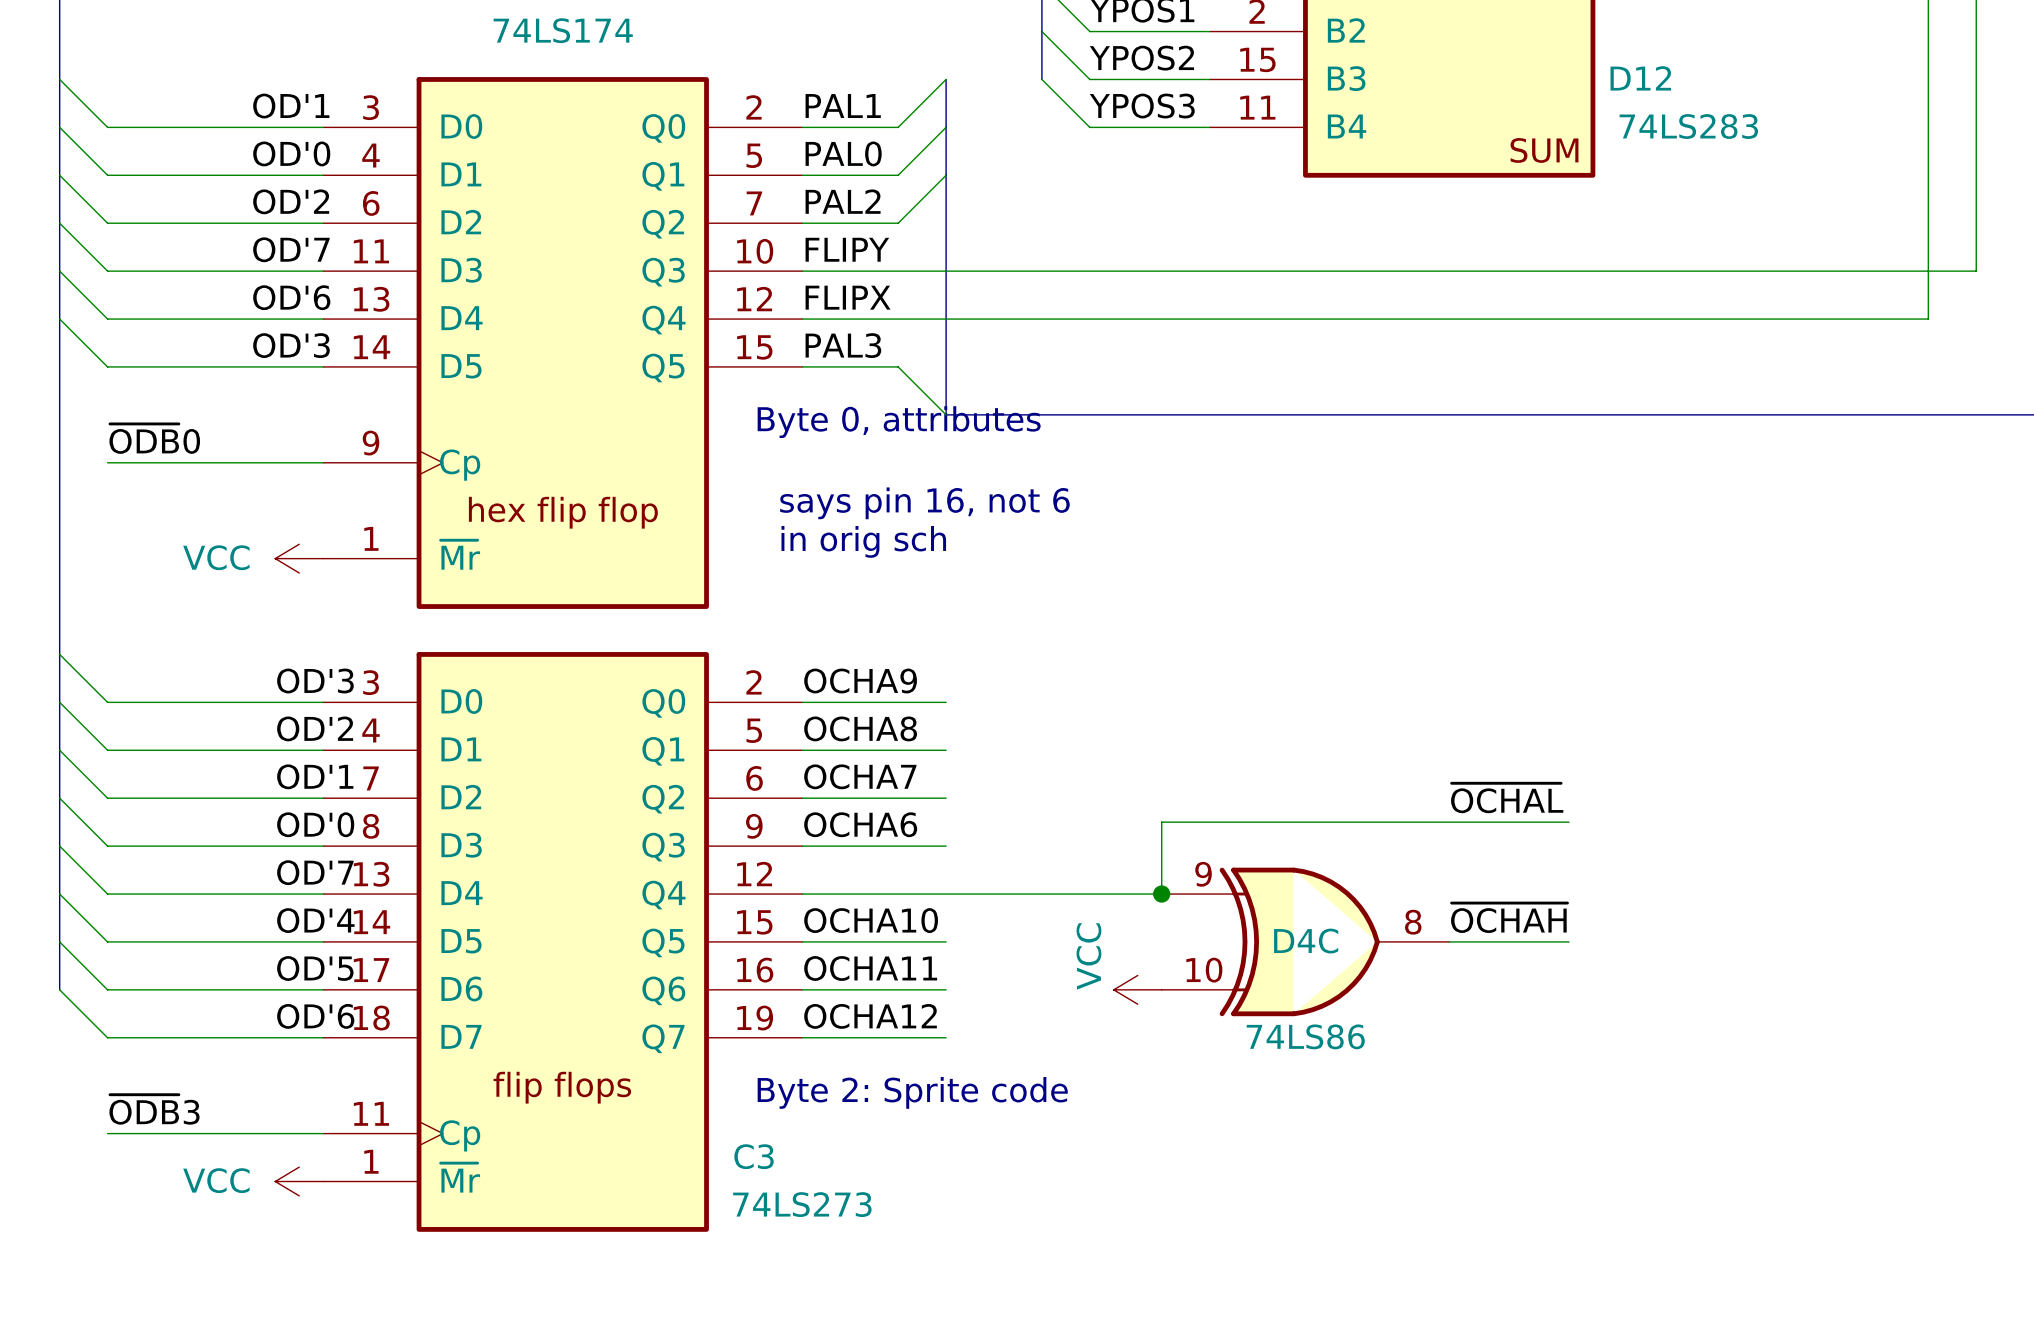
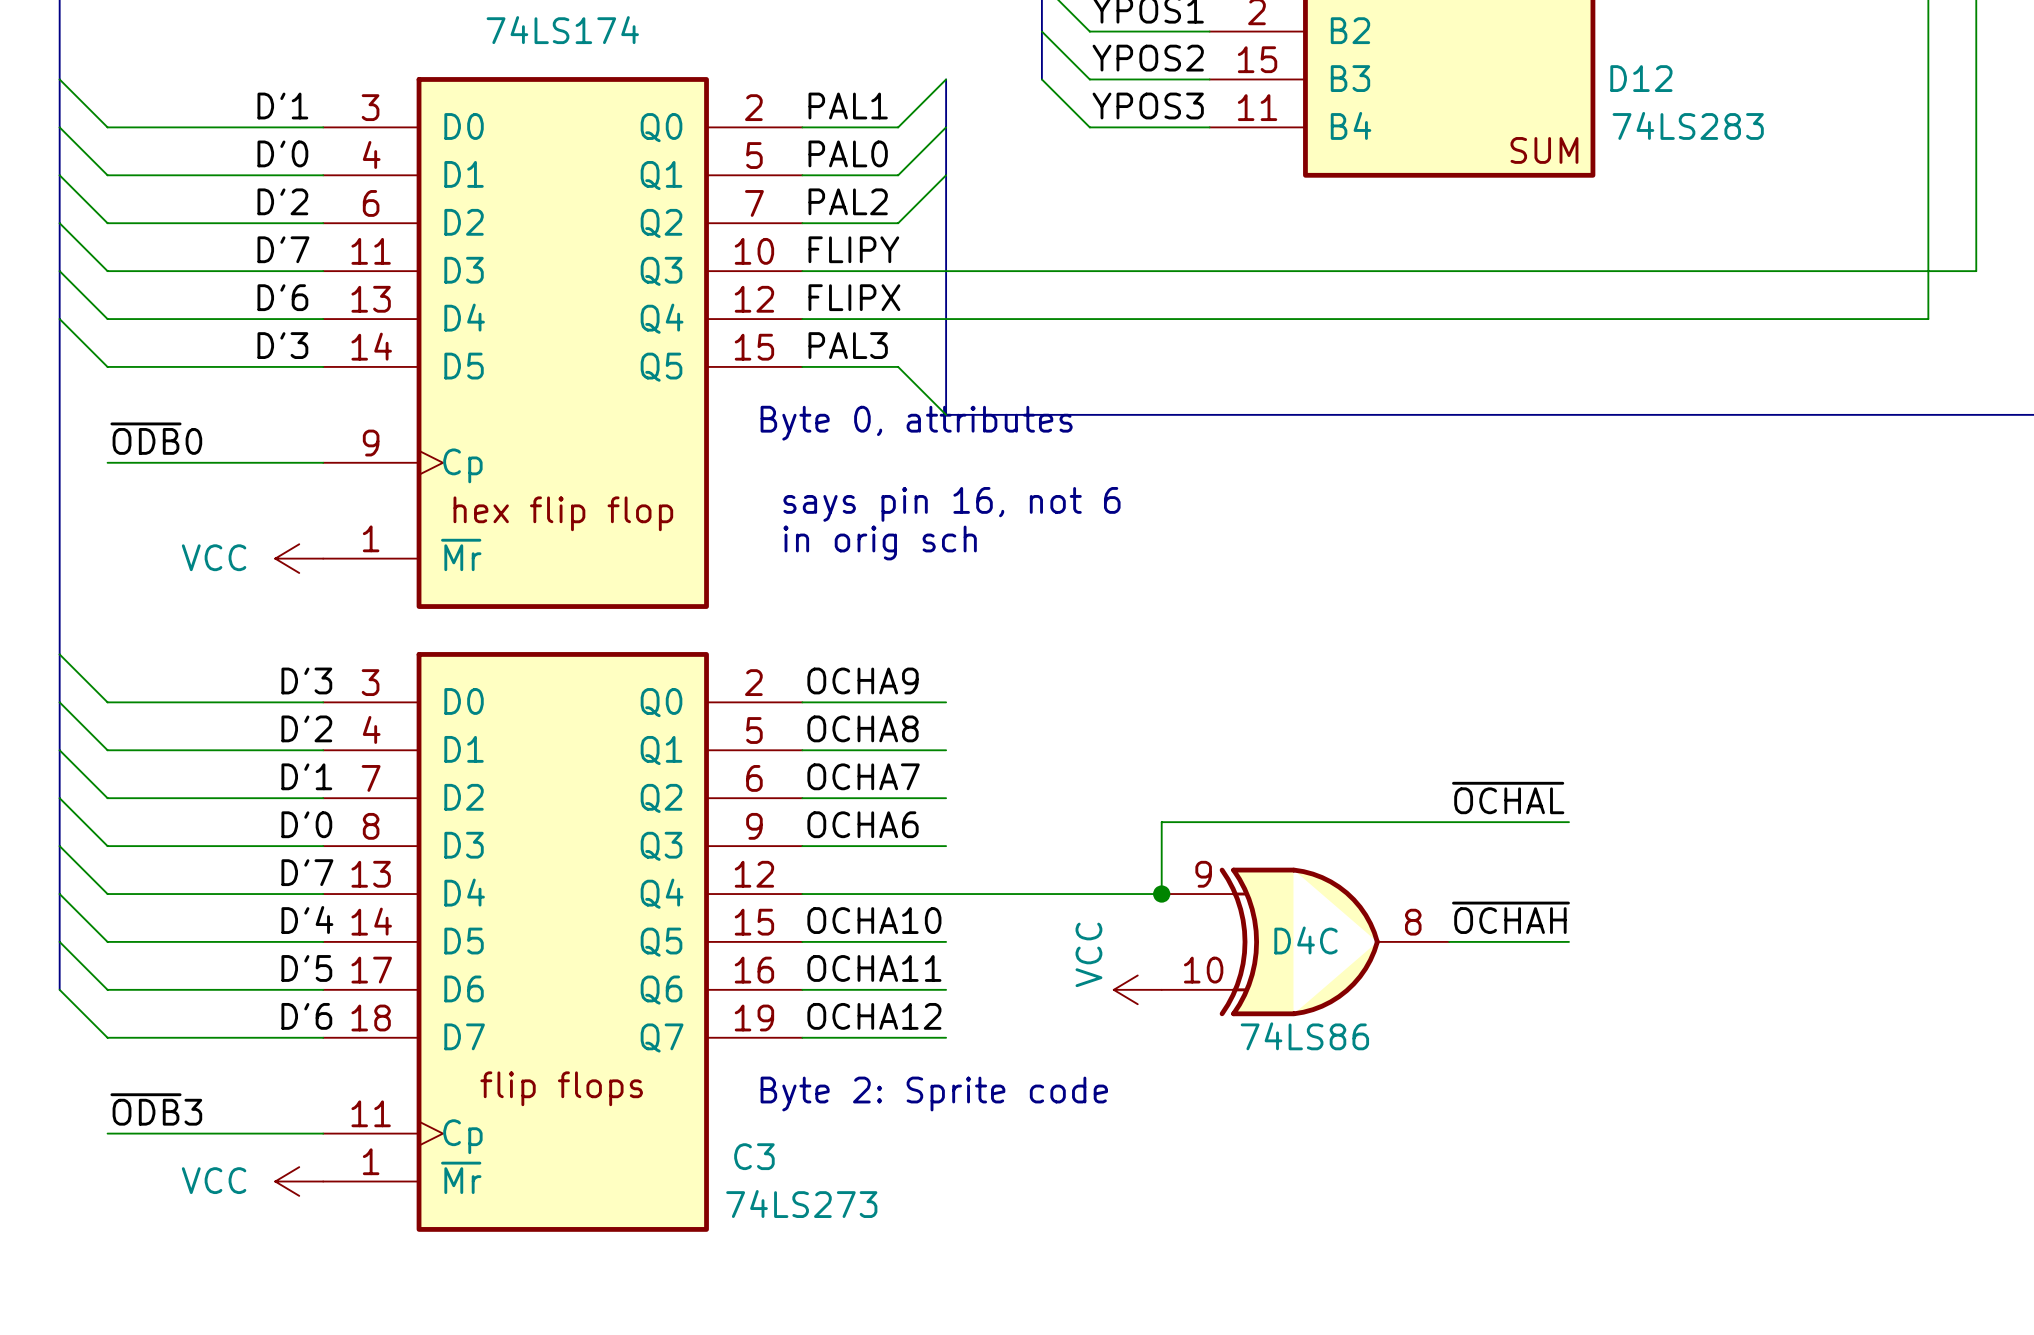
label: OD'1 (291, 106) -> D'1 (282, 106)
label: OD'0 (291, 153) -> D'0 (282, 153)
label: OD'2 (291, 201) -> D'2 (282, 201)
label: OD'7 (291, 249) -> D'7 (283, 249)
label: OD'6 (291, 297) -> D'6 (282, 297)
label: OD'3 (291, 345) -> D'3 (282, 345)
label: OD'3 (315, 681) -> D'3 (306, 680)
label: OD'2 (315, 728) -> D'2 (306, 728)
label: OD'1 (315, 776) -> D'1 (306, 776)
label: OD'0 (315, 824) -> D'0 (306, 824)
label: OD'7 (315, 872) -> D'7 (307, 872)
label: OD'4 (315, 920) -> D'4 (307, 919)
label: OD'5 (315, 968) -> D'5 (306, 968)
label: OD'6 (315, 1016) -> D'6 (306, 1016)

